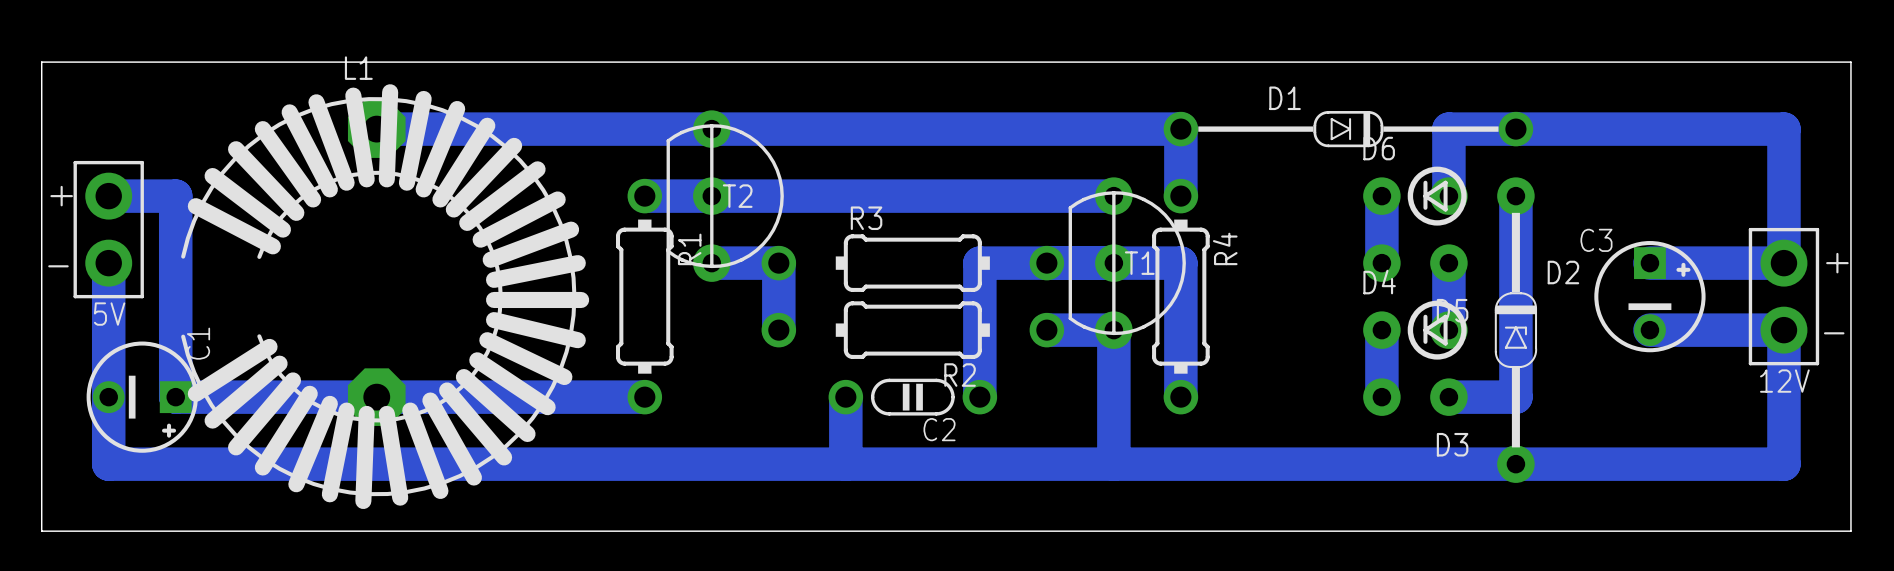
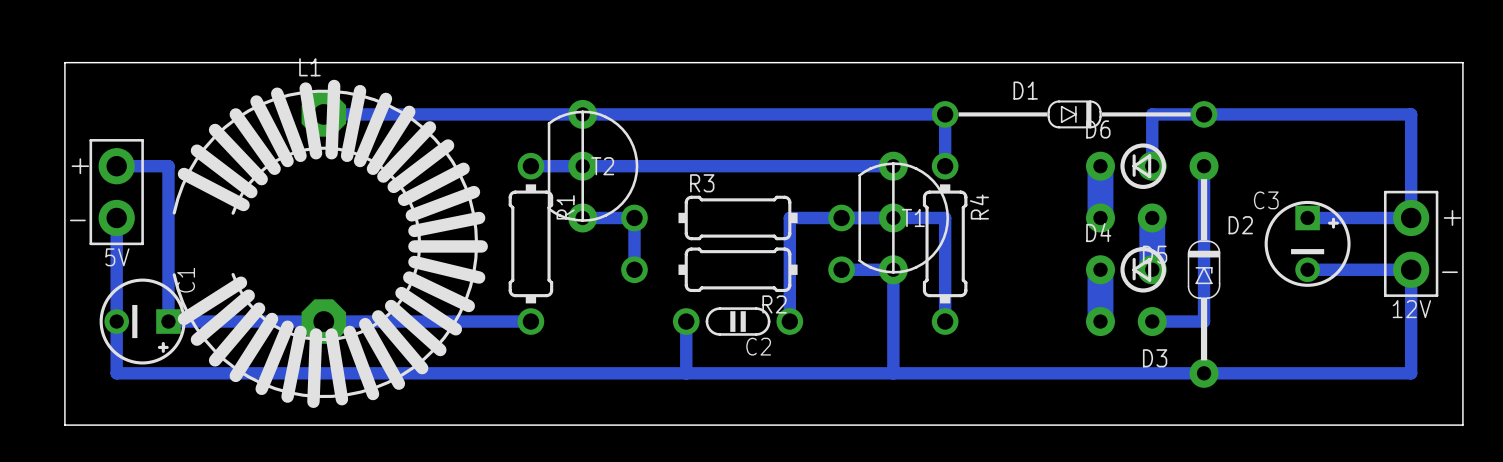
bottom track width: thick (376, 129) (1180, 129) (1180, 196) -> thin (323, 114) (945, 114) (945, 166)
bottom track width: thick (108, 196) (175, 196) (175, 397) (644, 397) -> thin (116, 166) (168, 166) (168, 321) (530, 321)
bottom track width: thick (644, 196) (1113, 196) -> thin (530, 166) (893, 166)
bottom track width: thick (1448, 196) (1448, 129) (1783, 129) (1783, 263) (1649, 263) -> thin (1152, 166) (1152, 114) (1411, 114) (1411, 217) (1307, 217)
bottom track width: thick (1515, 196) (1515, 397) (1448, 397) -> thin (1204, 166) (1204, 321) (1152, 321)
bottom track width: thick (108, 263) (108, 464) (1783, 464) (1783, 330) (1649, 330) -> thin (116, 217) (116, 373) (1411, 373) (1411, 269) (1307, 269)
bottom track width: thick (711, 263) (778, 263) (778, 330) -> thin (582, 217) (634, 217) (634, 269)
bottom track width: thick (1046, 330) (1113, 330) (1113, 464) -> thin (841, 269) (893, 269) (893, 373)
bottom track width: thick (845, 397) (845, 464) -> thin (686, 321) (686, 373)
bottom track width: thick (979, 397) (979, 263) (1180, 263) (1180, 397) -> thin (789, 321) (789, 217) (945, 217) (945, 321)

